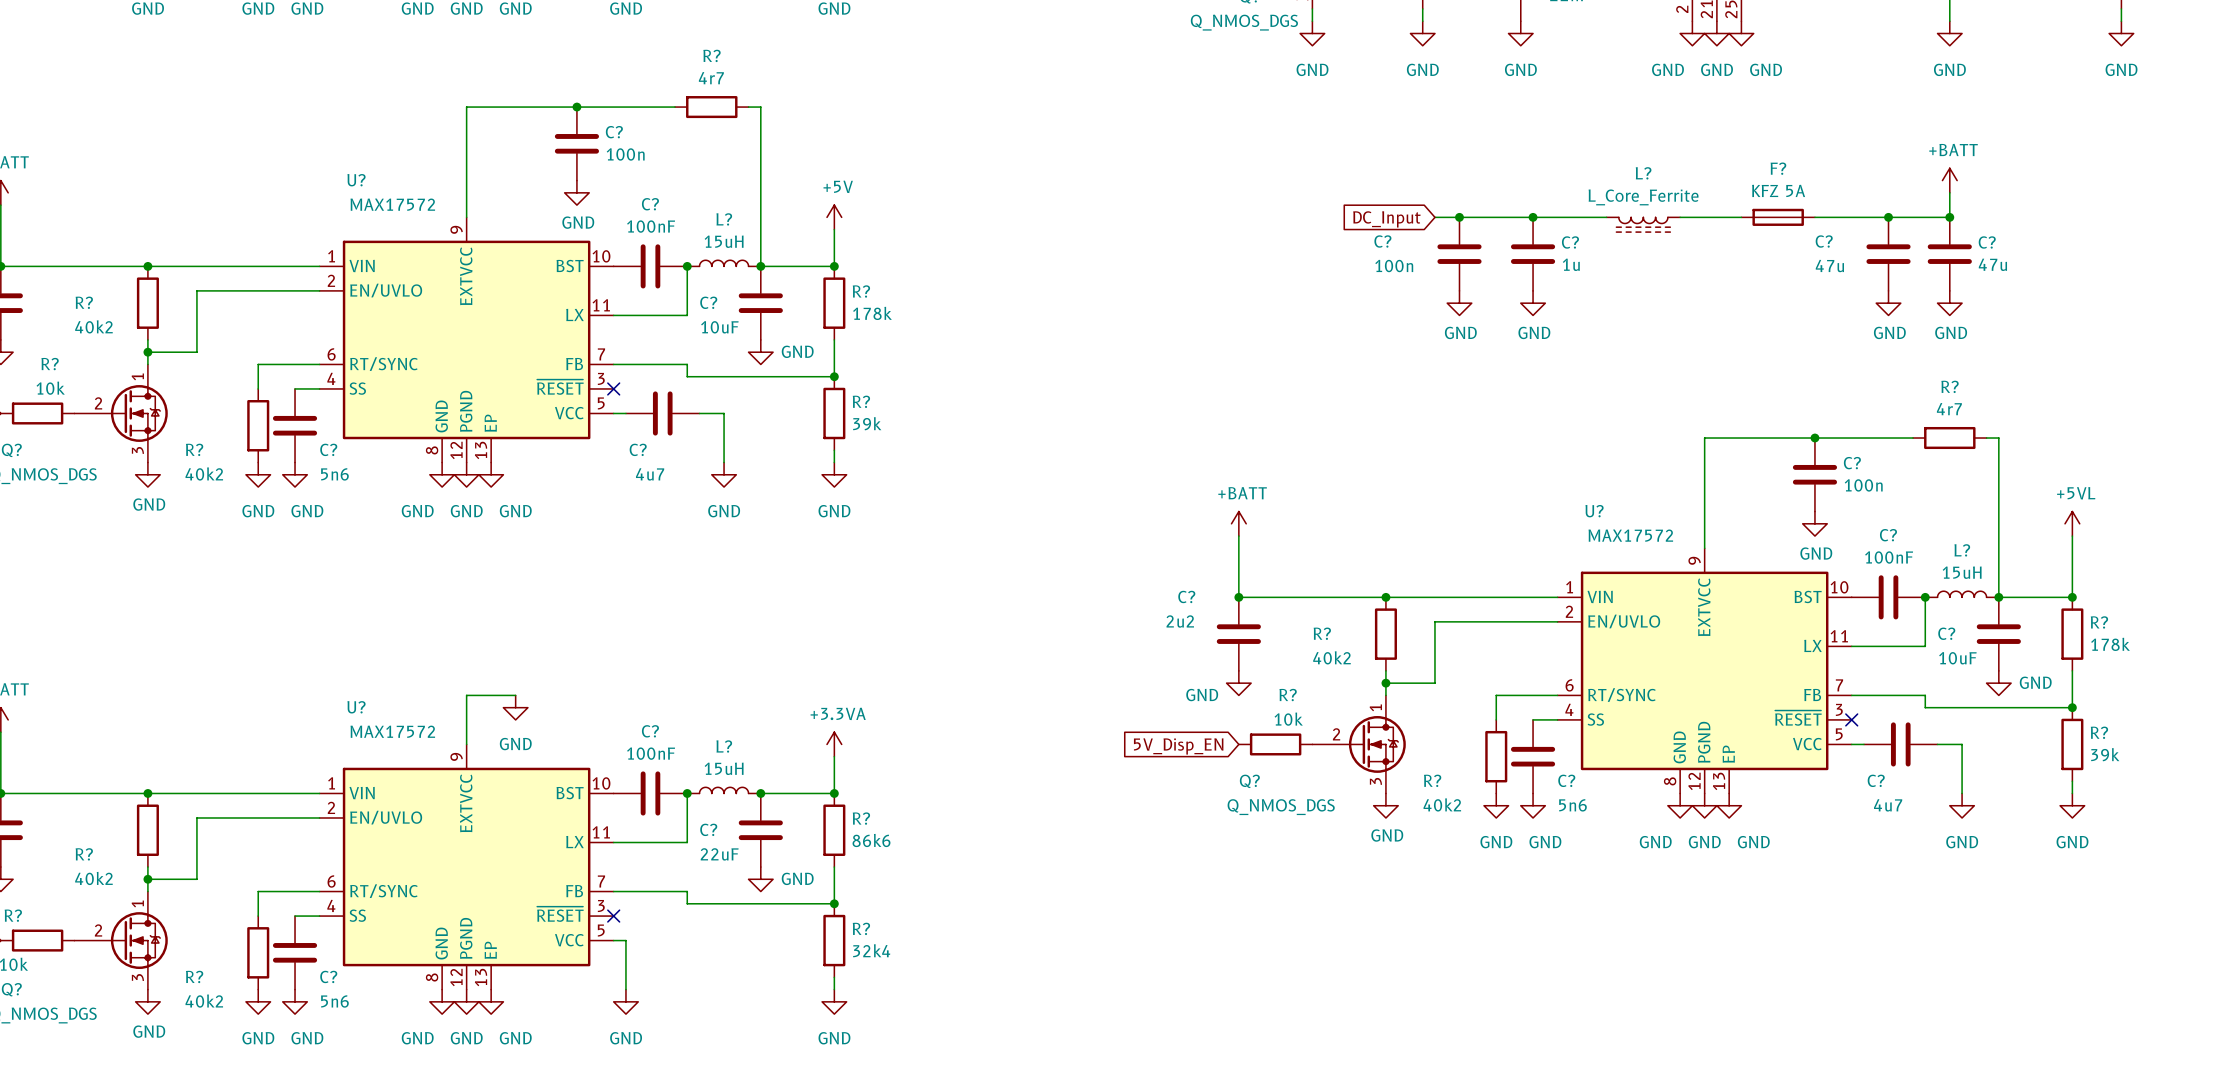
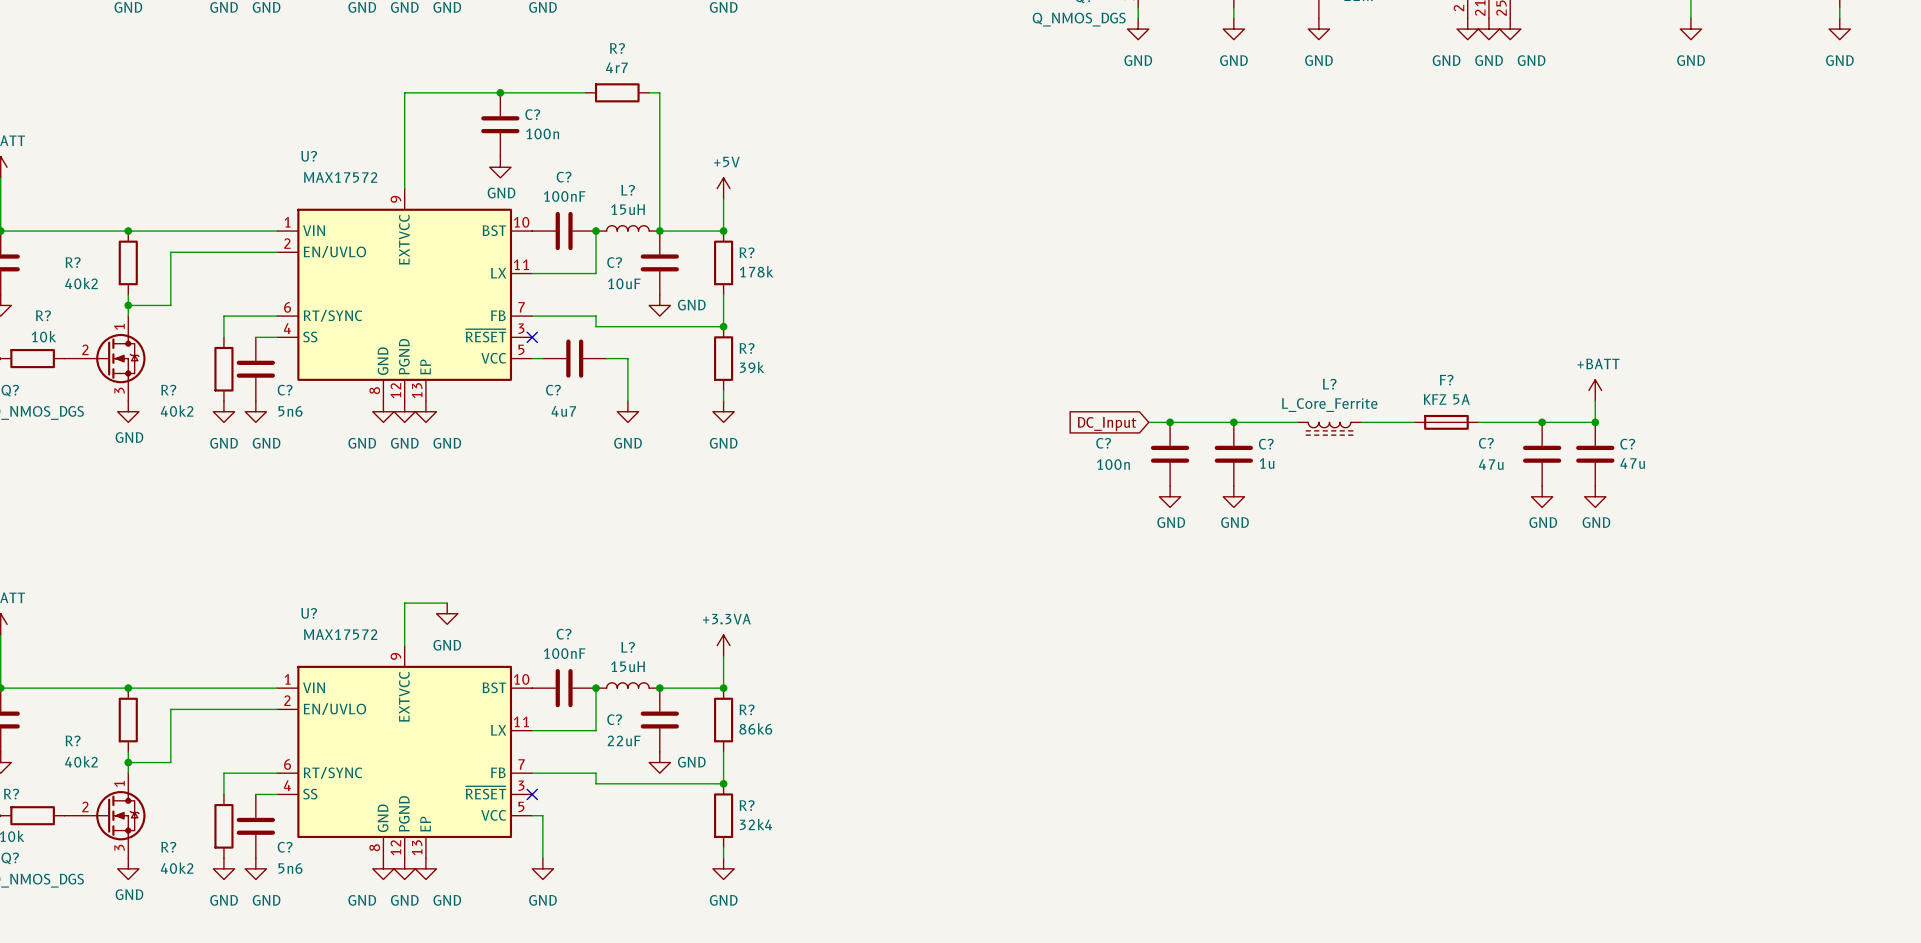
power symbol: +BATT (1949, 180) -> none
wire: (1949, 192) (1949, 217) (1814, 217) -> none
wire: (1434, 217) (1606, 217) -> none
junction: (1459, 217) -> none
junction: (1533, 217) -> none
wire: (1680, 217) (1741, 217) -> none
F?: KFZ 5A (1778, 217) -> none
junction: (1888, 217) -> none
junction: (1949, 217) -> none
global label: DC_Input (1386, 219) -> none
L?: L_Core_Ferrite (1643, 224) -> none
C?: 100n (1459, 254) -> none
C?: 1u (1533, 254) -> none
C?: 47u (1888, 254) -> none
C?: 47u (1949, 254) -> none
power symbol: GND (1459, 303) -> none
power symbol: GND (1533, 303) -> none
power symbol: GND (1888, 303) -> none
power symbol: GND (1949, 303) -> none
junction: (1814, 438) -> none
wire: (1913, 438) (1704, 438) (1704, 548) -> none
R?: 4r7 (1949, 438) -> none
wire: (1986, 438) (1998, 438) (1998, 597) (2072, 597) (2072, 536) -> none
power symbol: none -> +BATT (1595, 390)
wire: none -> (1595, 401) (1595, 422) (1478, 422)
C?: 100n (1814, 474) -> none
wire: none -> (1148, 422) (1297, 422)
junction: none -> (1170, 422)
junction: none -> (1233, 422)
wire: none -> (1361, 422) (1414, 422)
F?: none -> KFZ 5A (1446, 422)
junction: none -> (1542, 422)
junction: none -> (1595, 422)
global label: none -> DC_Input (1107, 424)
L?: none -> L_Core_Ferrite (1329, 428)
power symbol: +BATT (1238, 523) -> none
C?: none -> 100n (1170, 454)
C?: none -> 1u (1233, 454)
C?: none -> 47u (1542, 454)
power symbol: GND (1814, 523) -> none
C?: none -> 47u (1595, 454)
power symbol: +5VL (2072, 523) -> none
wire: (1238, 536) (1238, 597) (1557, 597) -> none
power symbol: none -> GND (1170, 496)
power symbol: none -> GND (1233, 496)
power symbol: none -> GND (1542, 496)
power symbol: none -> GND (1595, 496)
L?: 15uH (1962, 594) -> none
junction: (1238, 597) -> none
junction: (1385, 597) -> none
C?: 100nF (1888, 597) -> none
wire: (1925, 597) (1925, 646) (1851, 646) -> none
junction: (1925, 597) -> none
junction: (1998, 597) -> none
junction: (2072, 597) -> none
wire: (1557, 621) (1434, 621) (1434, 683) (1385, 683) -> none
C?: 2u2 (1238, 634) -> none
R?: 40k2 (1385, 634) -> none
C?: 10uF (1998, 634) -> none
R?: 178k (2072, 634) -> none
wire: (1385, 670) (1385, 695) -> none
U?: MAX17572 (1704, 670) -> none
wire: (2072, 670) (2072, 707) (1925, 707) (1925, 695) (1851, 695) -> none
power symbol: GND (1238, 683) -> none
junction: (1385, 683) -> none
power symbol: GND (1998, 683) -> none
wire: (1557, 695) (1496, 695) (1496, 719) -> none
junction: (2072, 707) -> none
wire: (1533, 719) (1557, 719) -> none
no-connect mark: (1851, 719) -> none
R?: 10k (1275, 744) -> none
Q?: Q_NMOS_DGS (1359, 744) -> none
wire: (1851, 744) (1863, 744) -> none
C?: 4u7 (1900, 744) -> none
wire: (1937, 744) (1962, 744) (1962, 793) -> none
R?: 39k (2072, 744) -> none
global label: 5V_Disp_EN (1178, 746) -> none
R?: 40k2 (1496, 756) -> none
C?: 5n6 (1533, 756) -> none
wire: (2072, 781) (2072, 793) -> none
power symbol: GND (1385, 805) -> none
power symbol: GND (1496, 805) -> none
power symbol: GND (1533, 805) -> none
power symbol: GND (1680, 805) -> none
power symbol: GND (1704, 805) -> none
power symbol: GND (1729, 805) -> none
power symbol: GND (1962, 805) -> none
power symbol: GND (2072, 805) -> none

